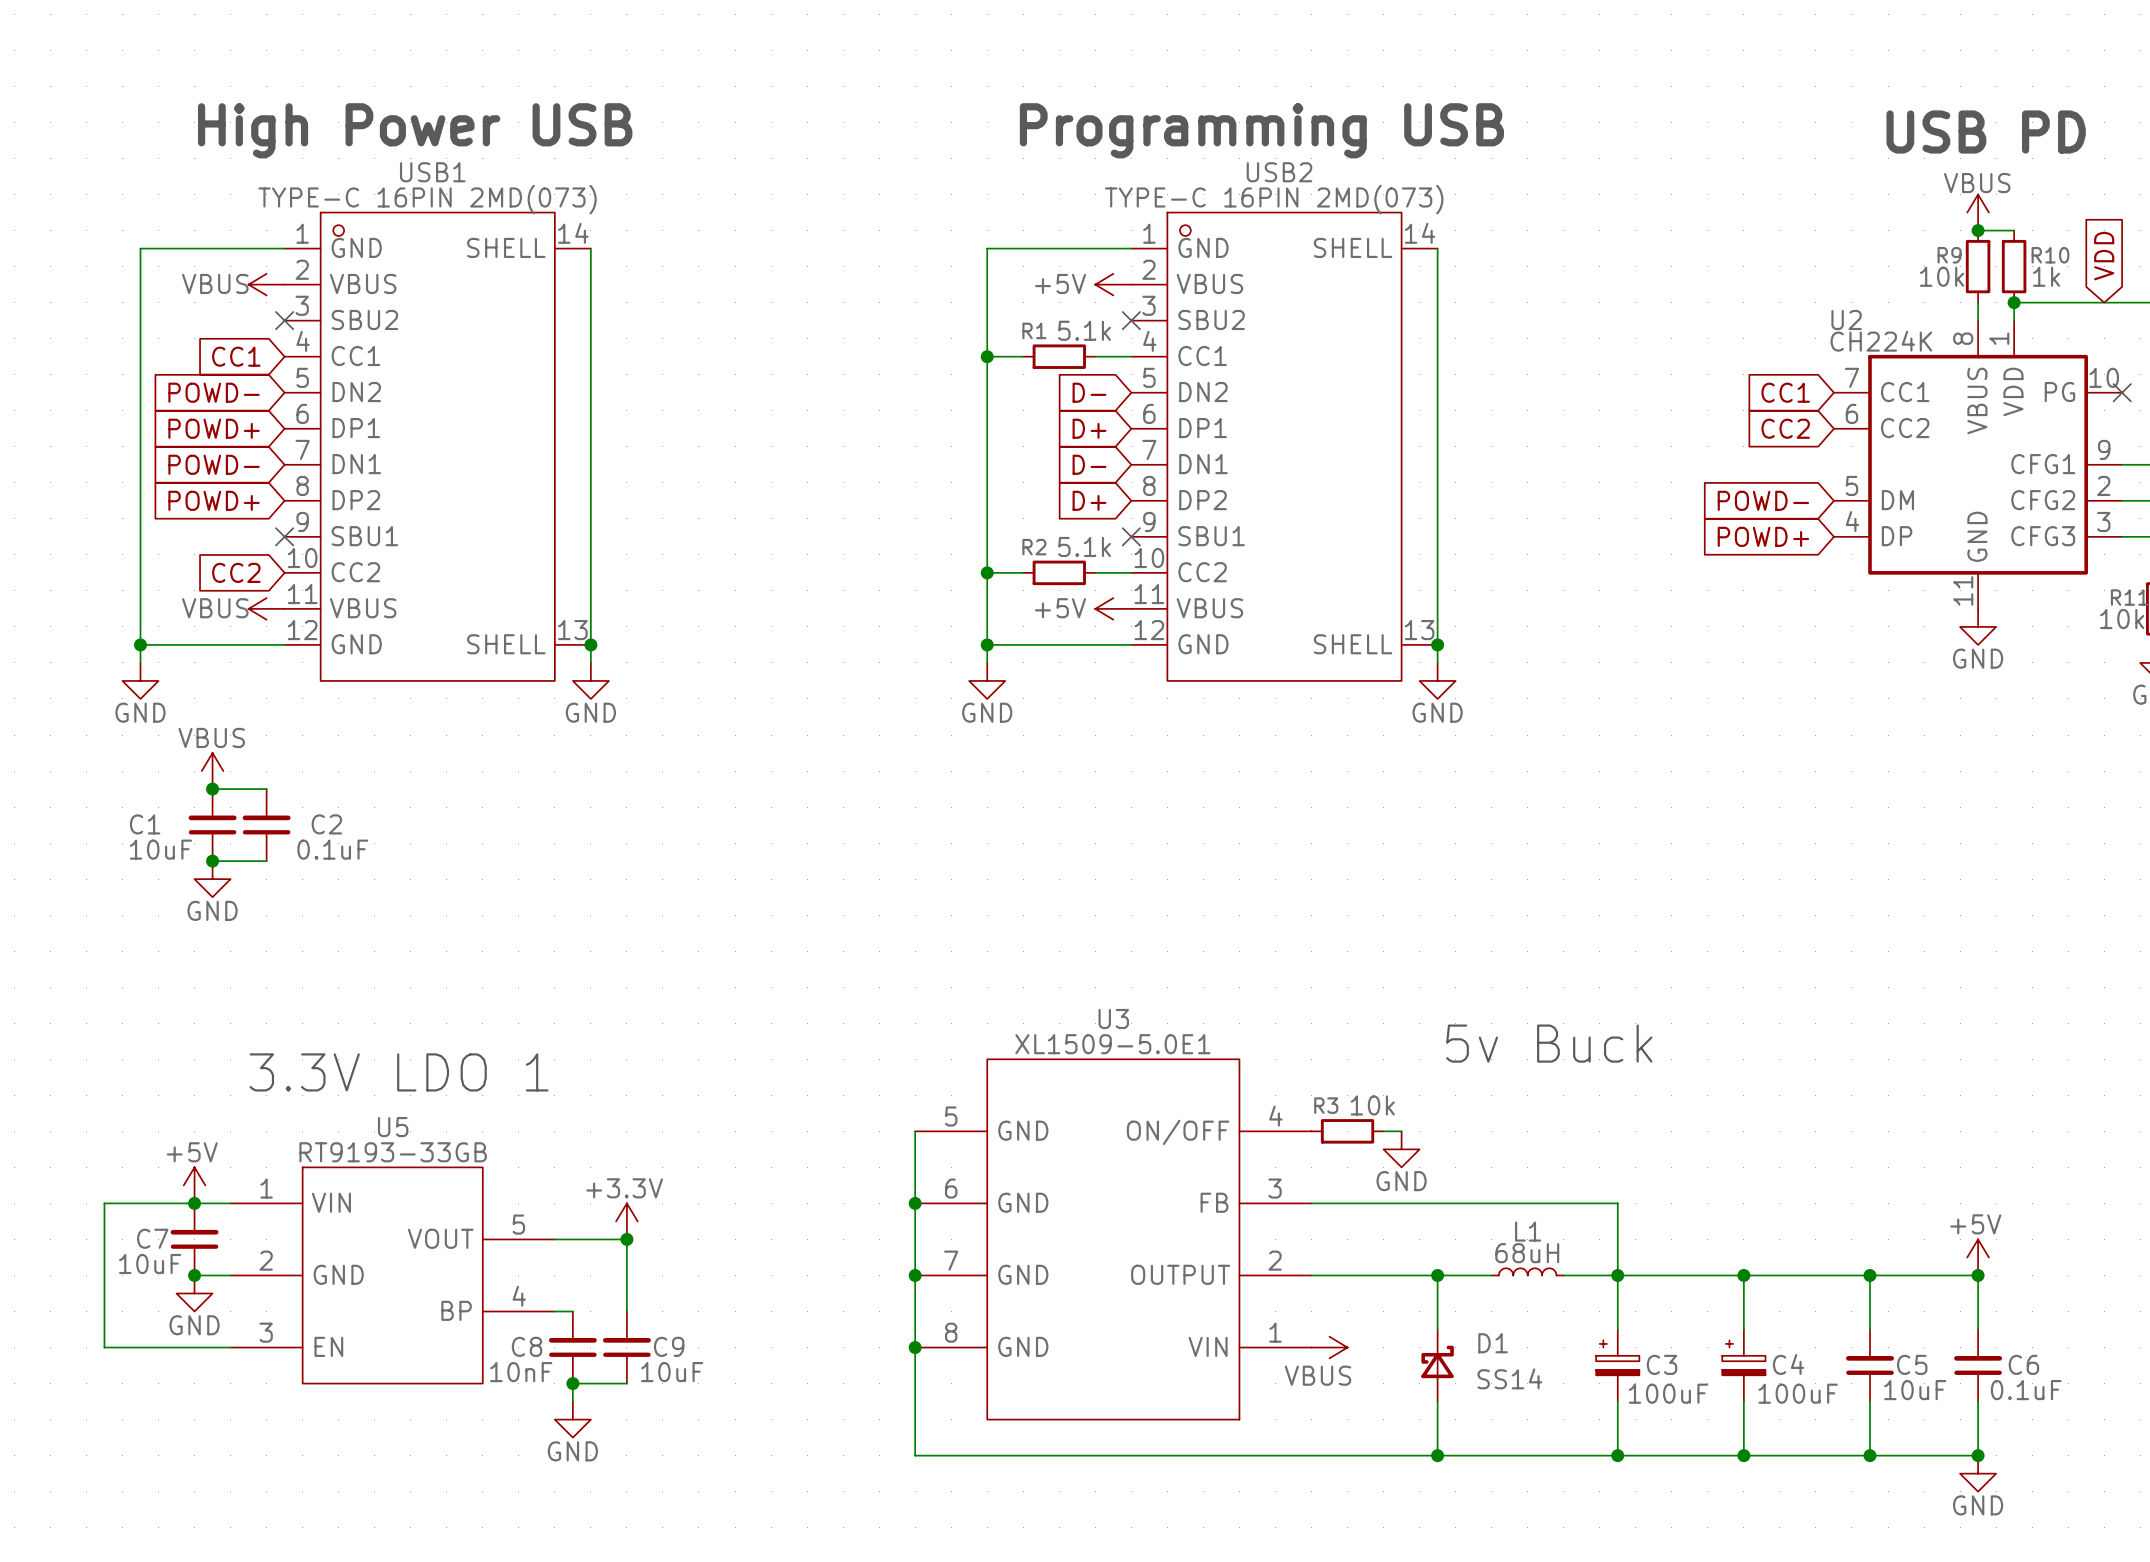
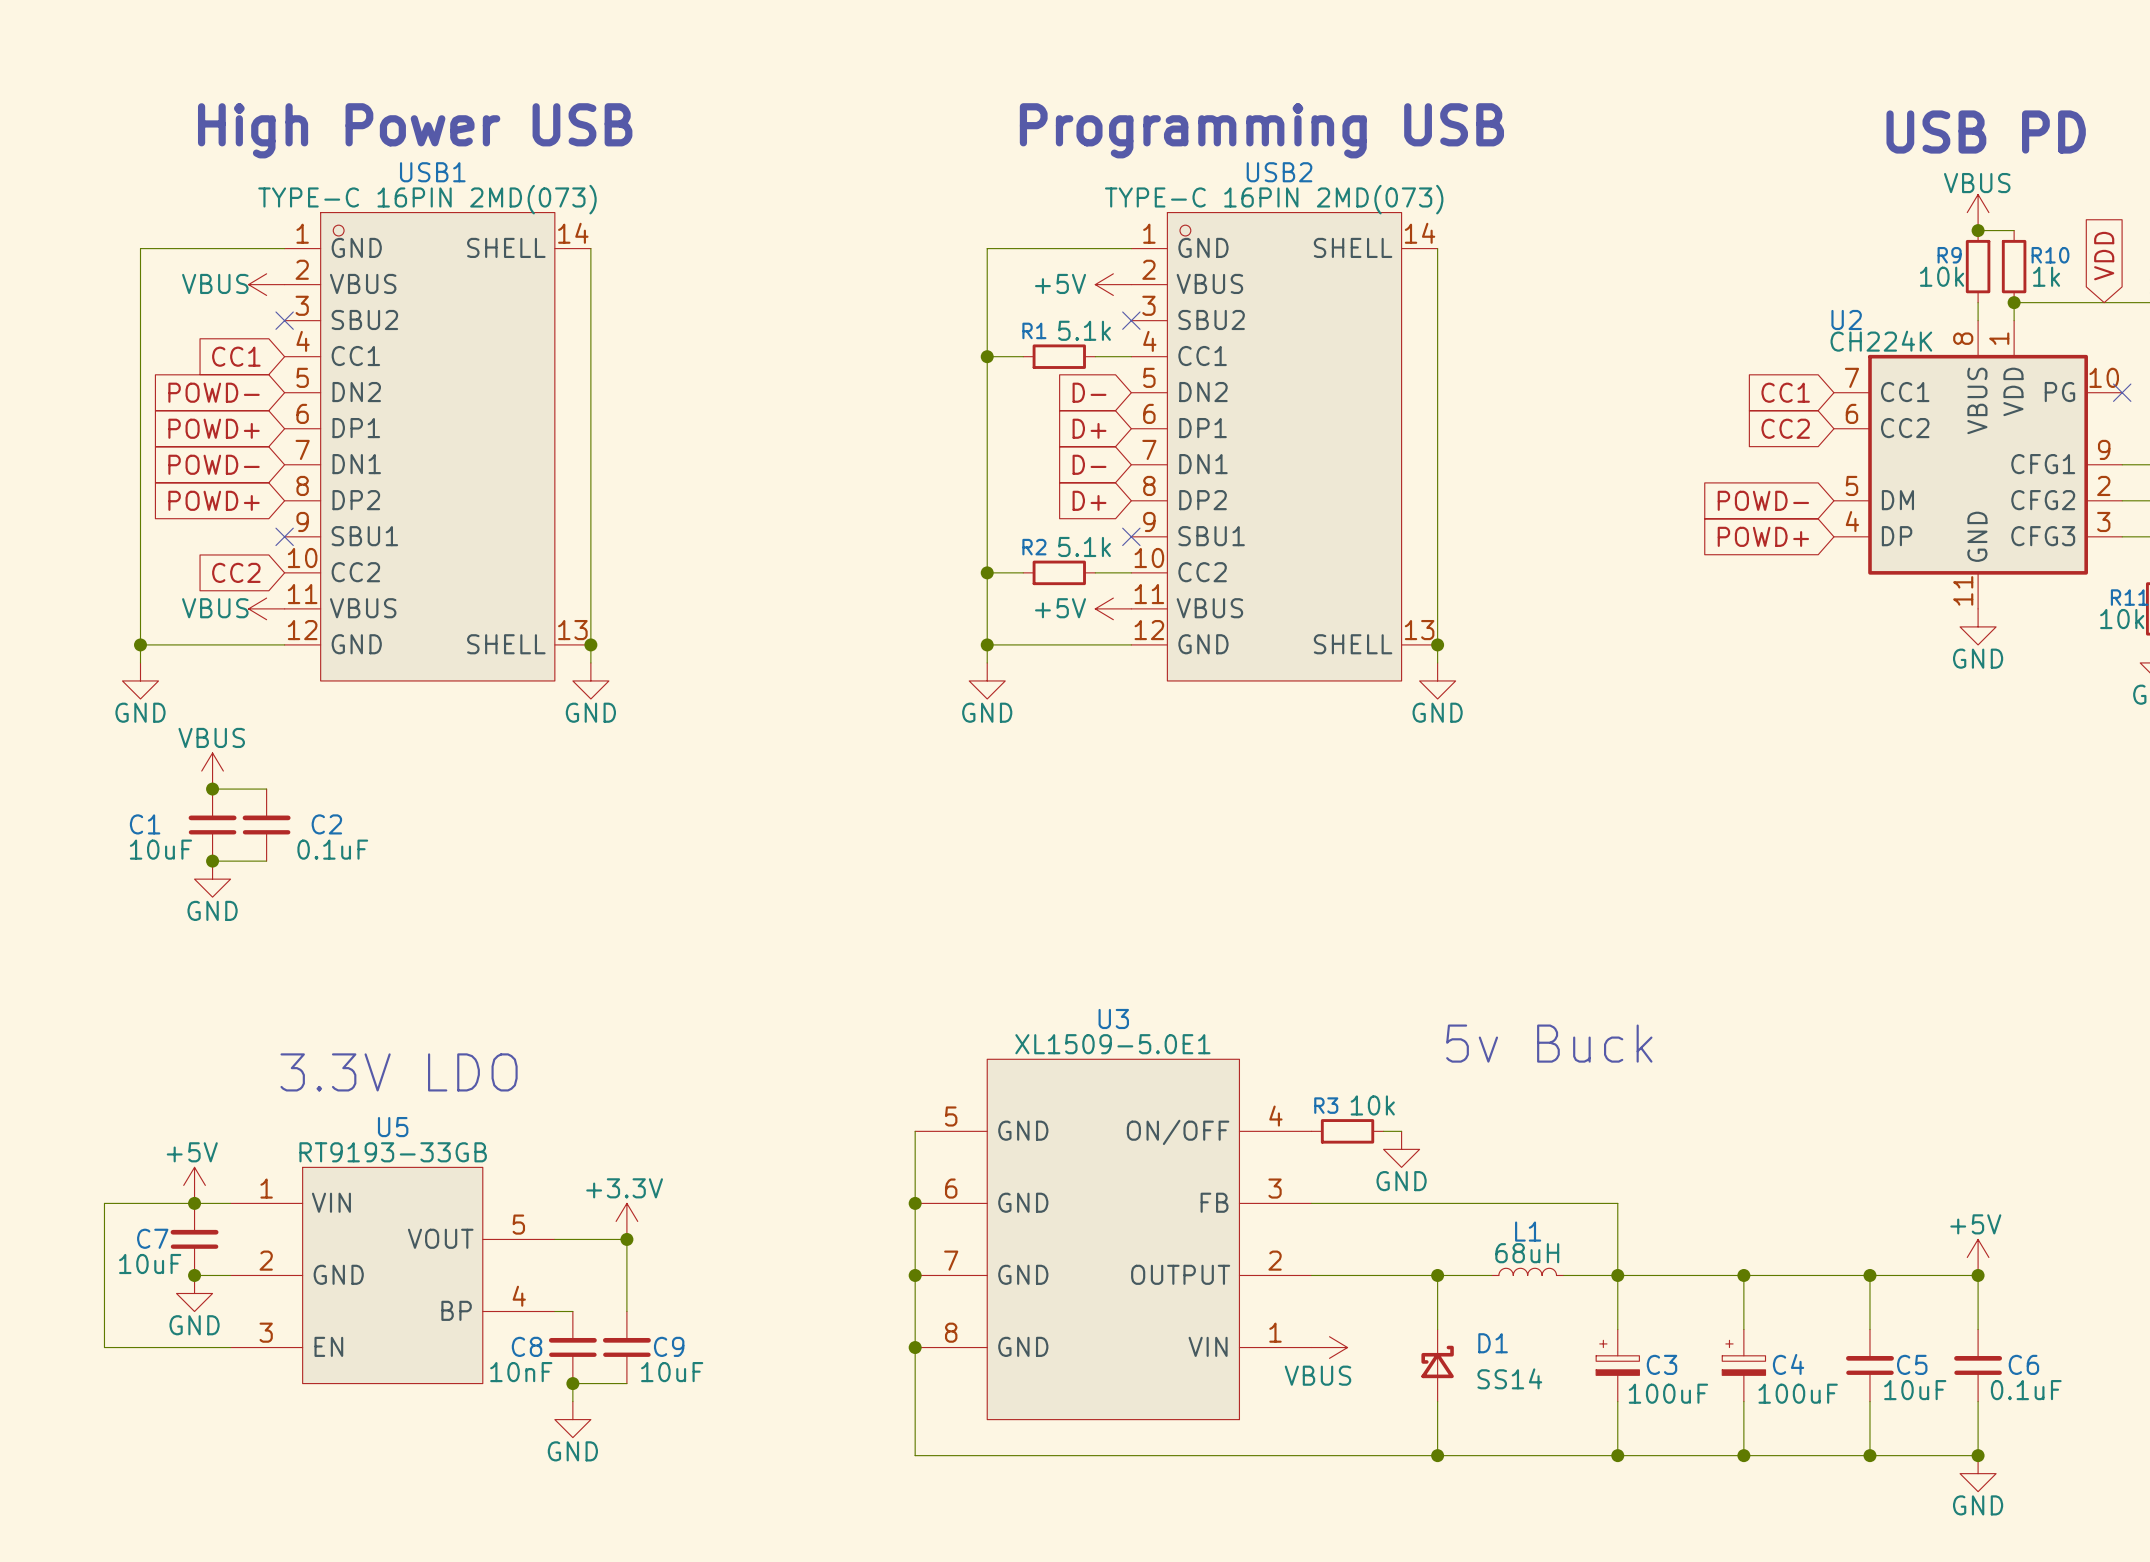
text: 3.3V LDO 1 (399, 1072) -> 3.3V LDO (399, 1072)

